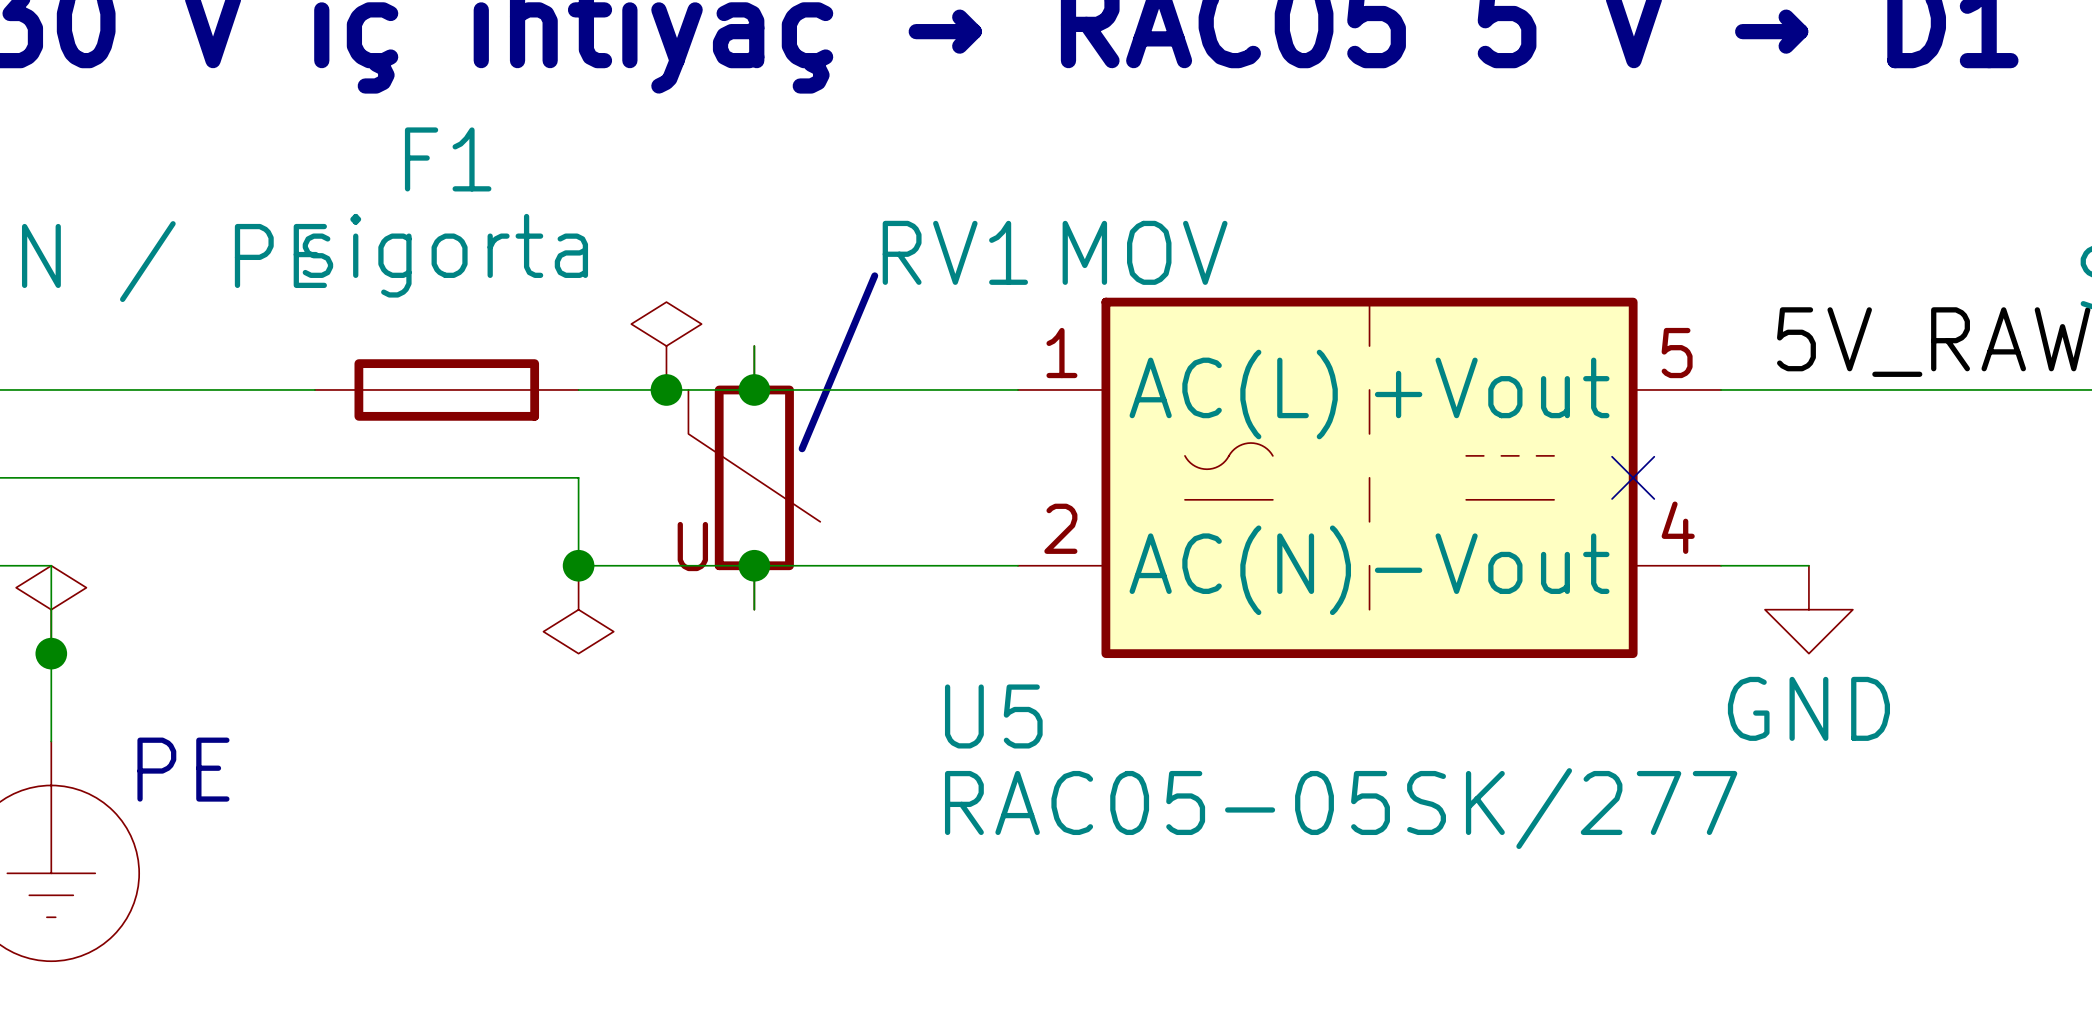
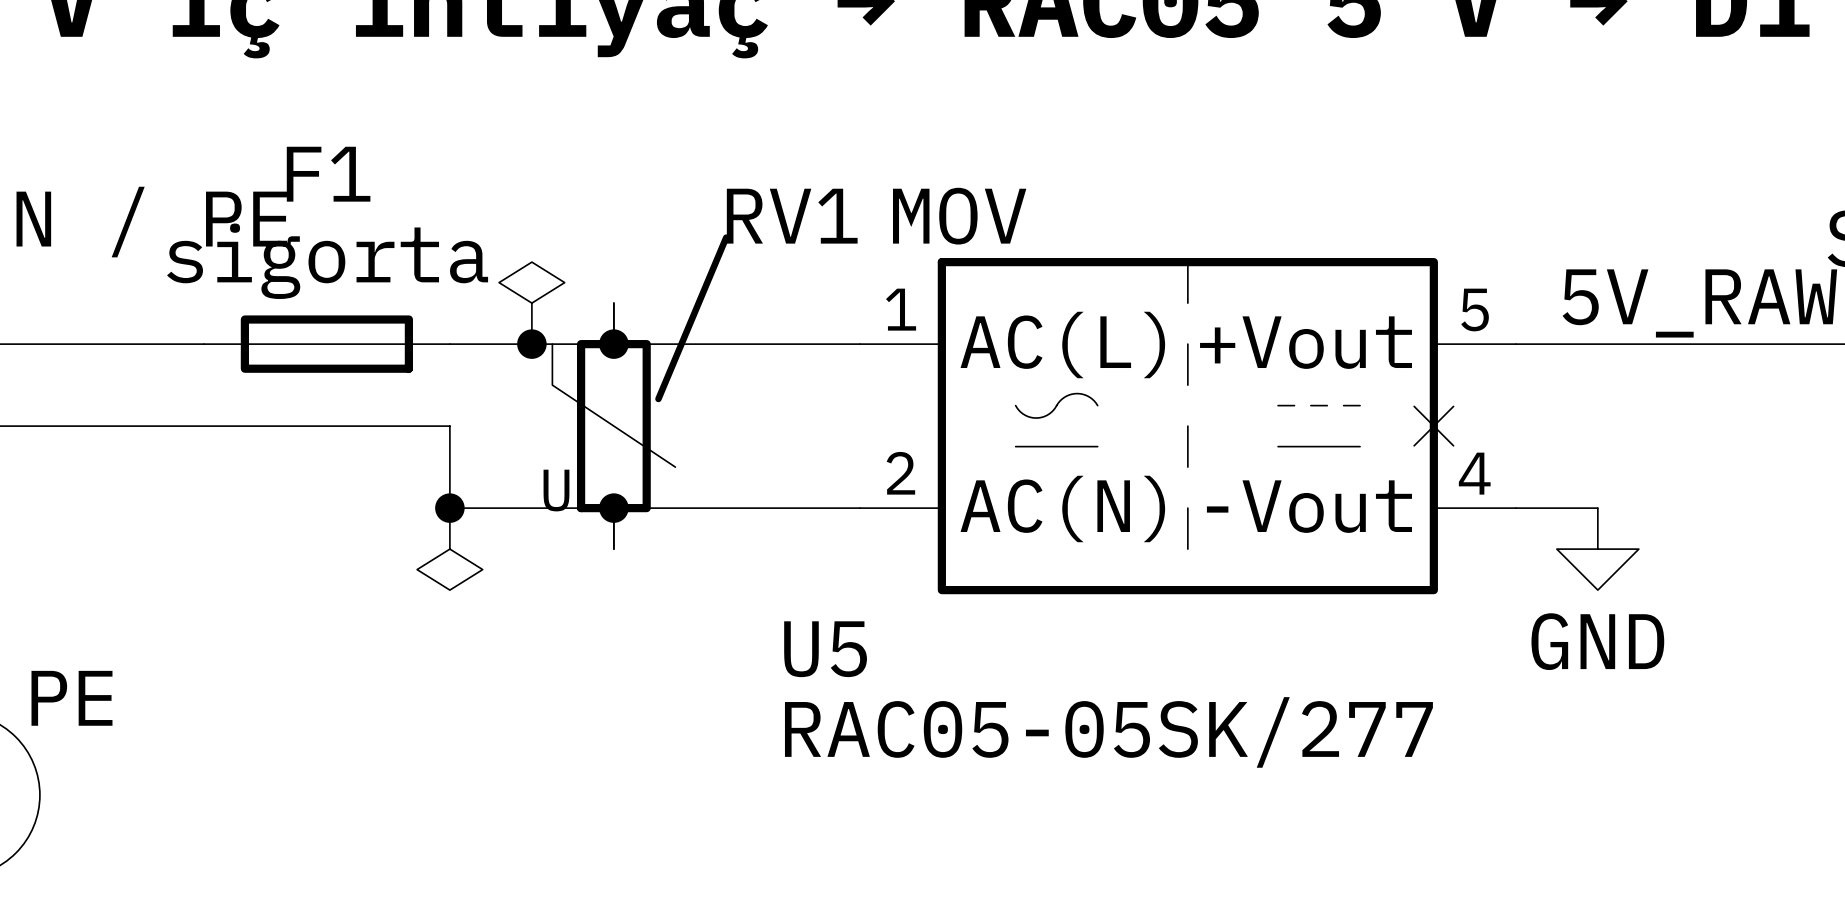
F1 name position: F1 (448, 159) -> F1 (328, 174)
F1 value position: sigorta (445, 255) -> sigorta (327, 261)

